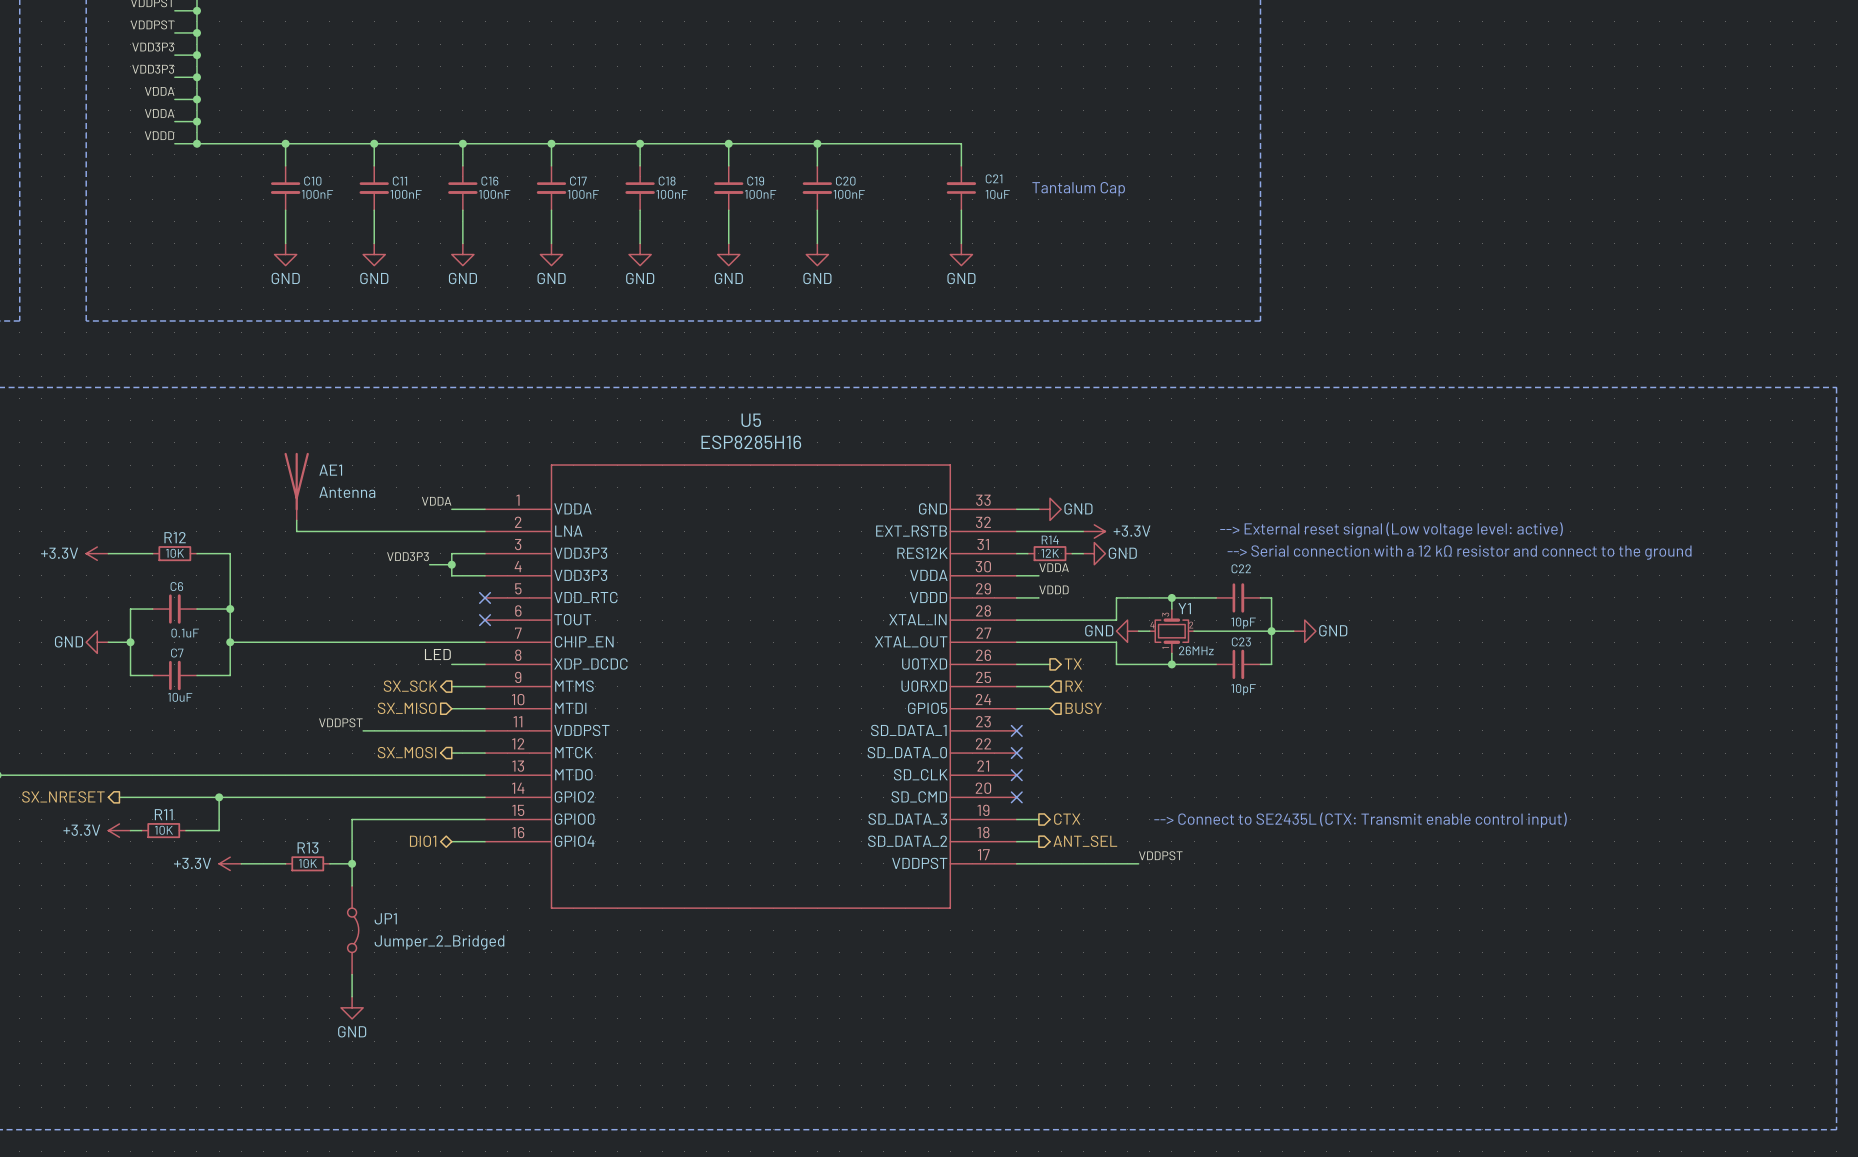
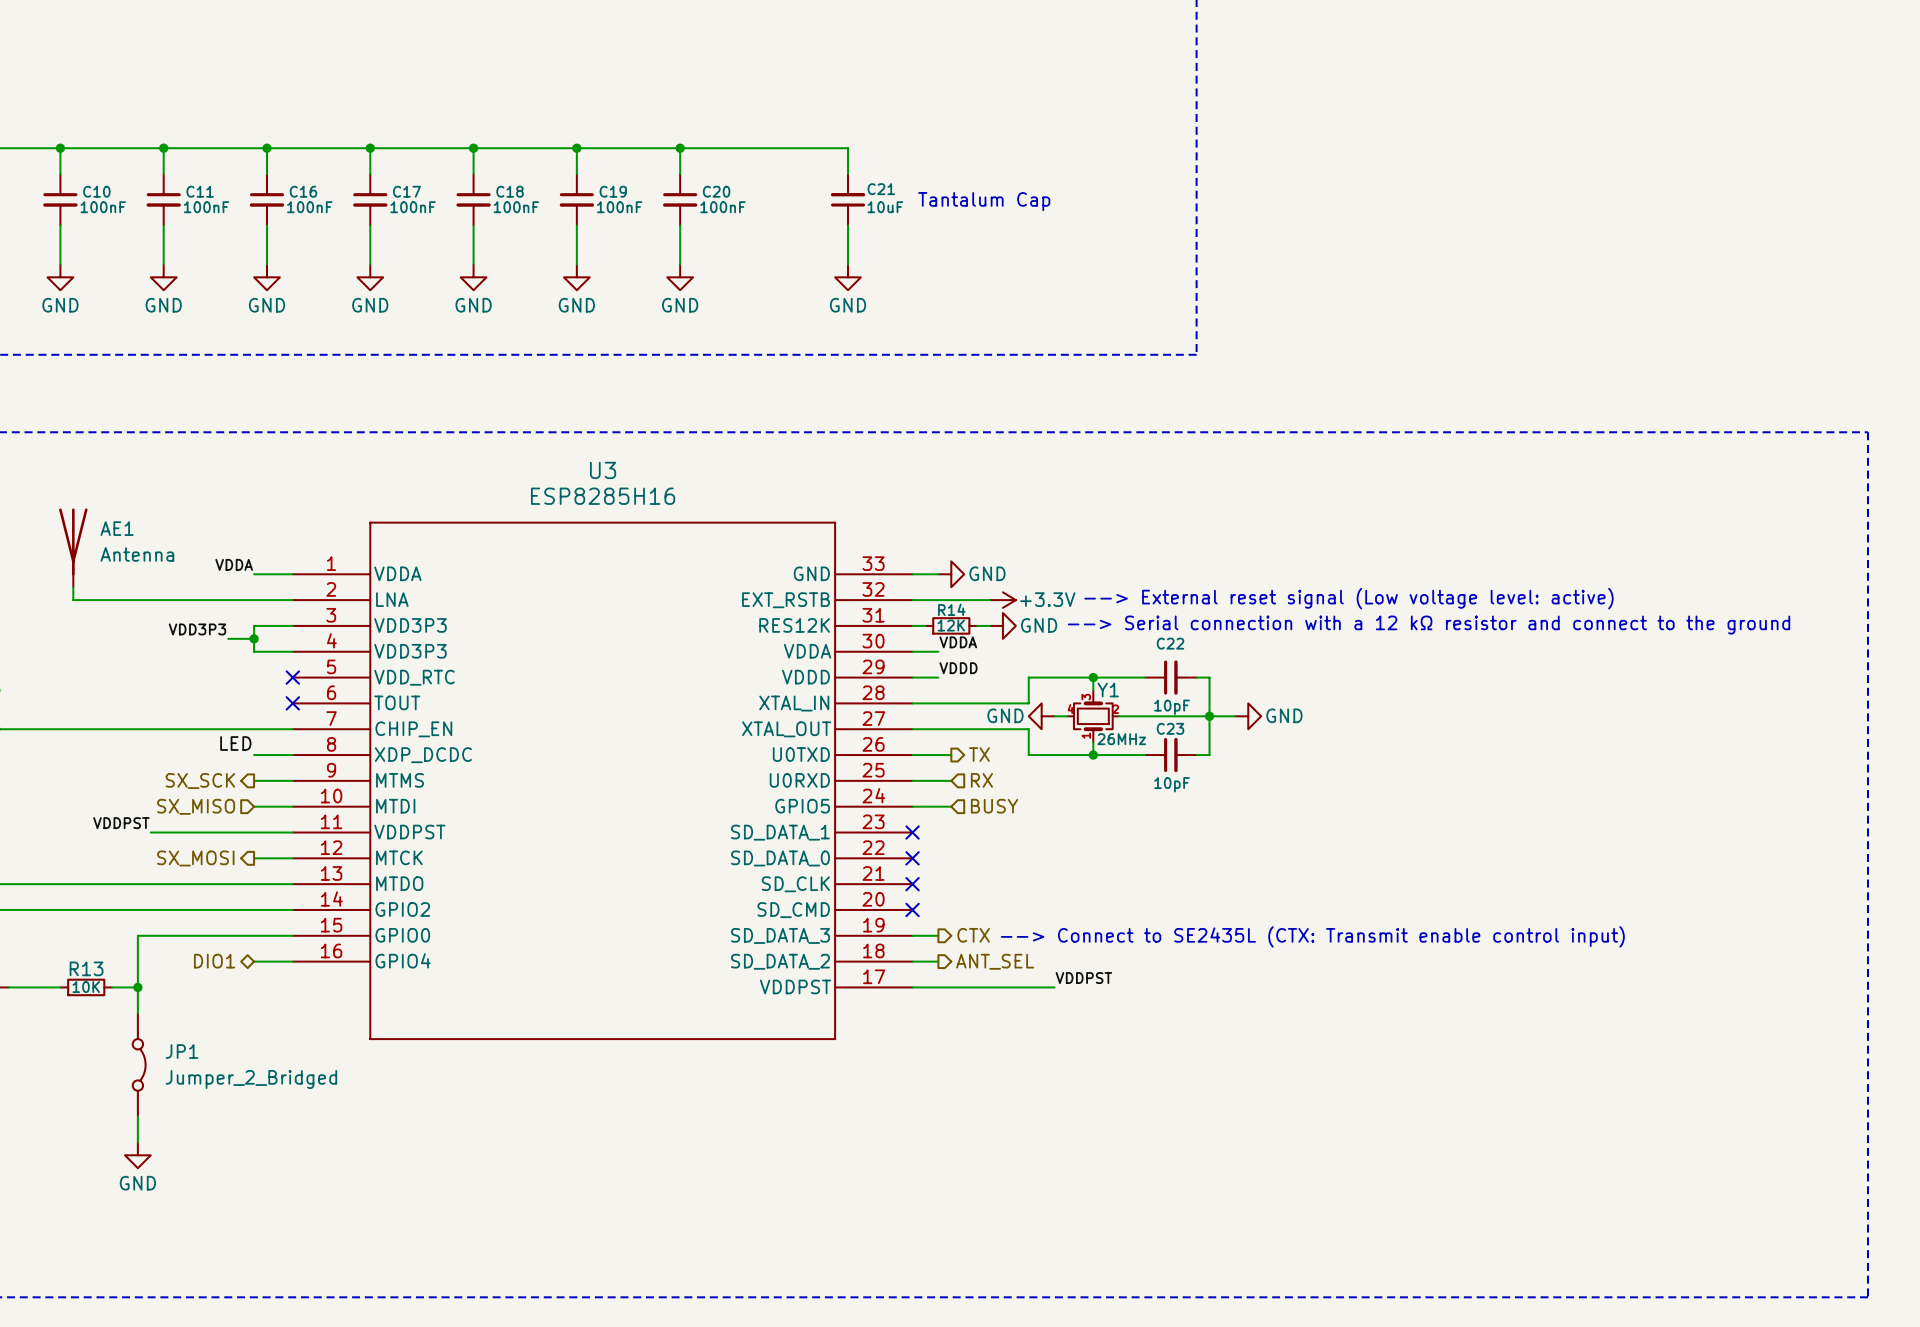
U5 name: U5 (751, 420) -> U3 (603, 470)

